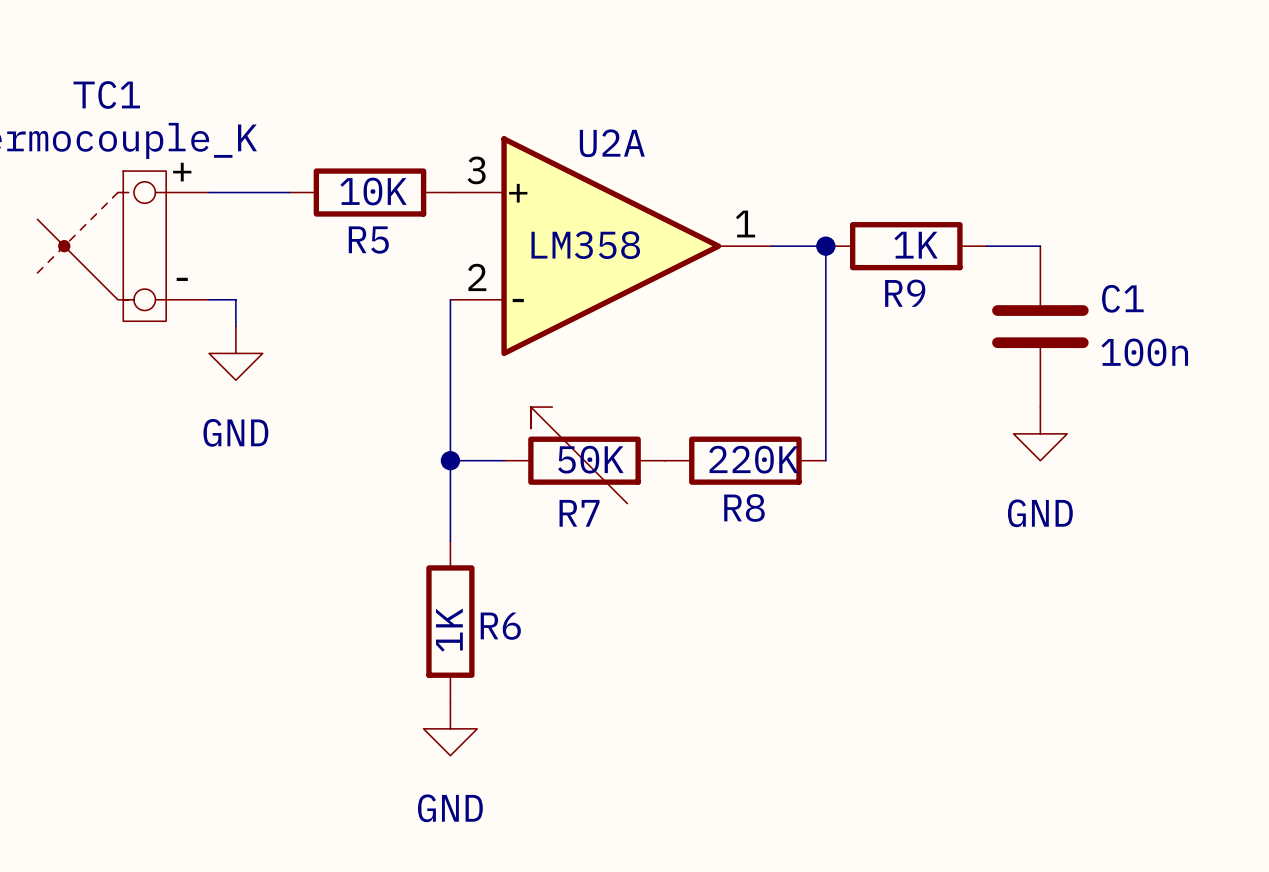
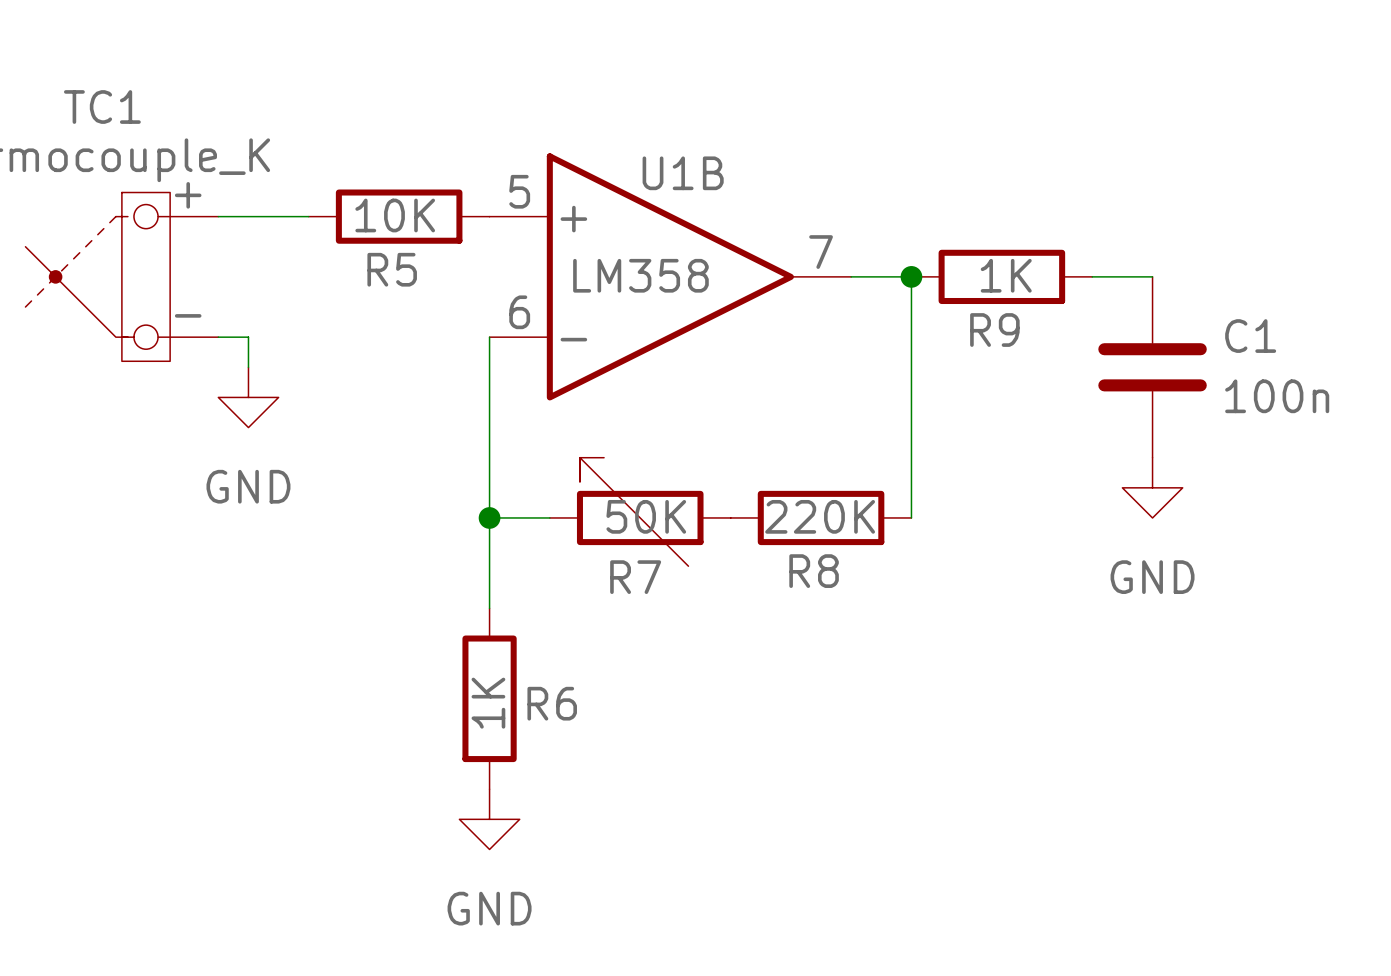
U2A name: U2A (612, 143) -> U1B (683, 173)
U2A pin number: 3 (476, 170) -> 5 (519, 191)
U2A pin number: 1 (745, 224) -> 7 (821, 252)
U2A pin number: 2 (477, 277) -> 6 (519, 312)

